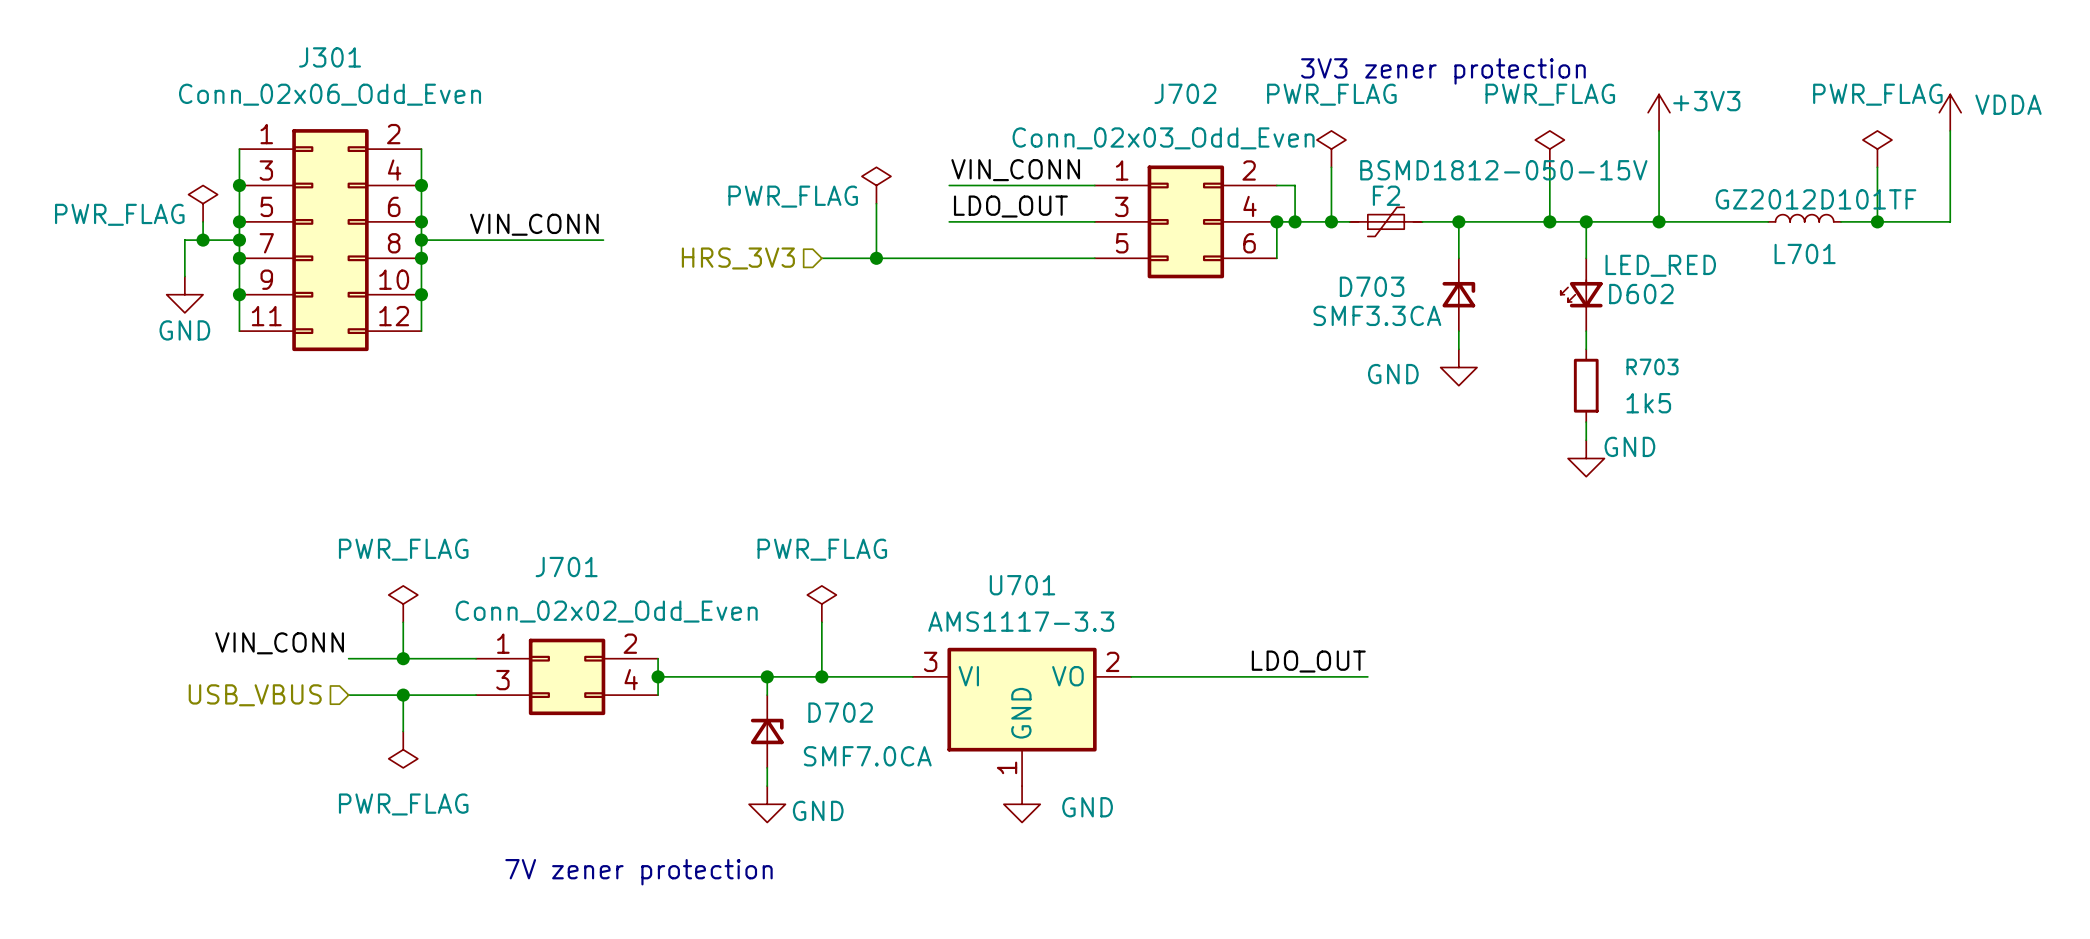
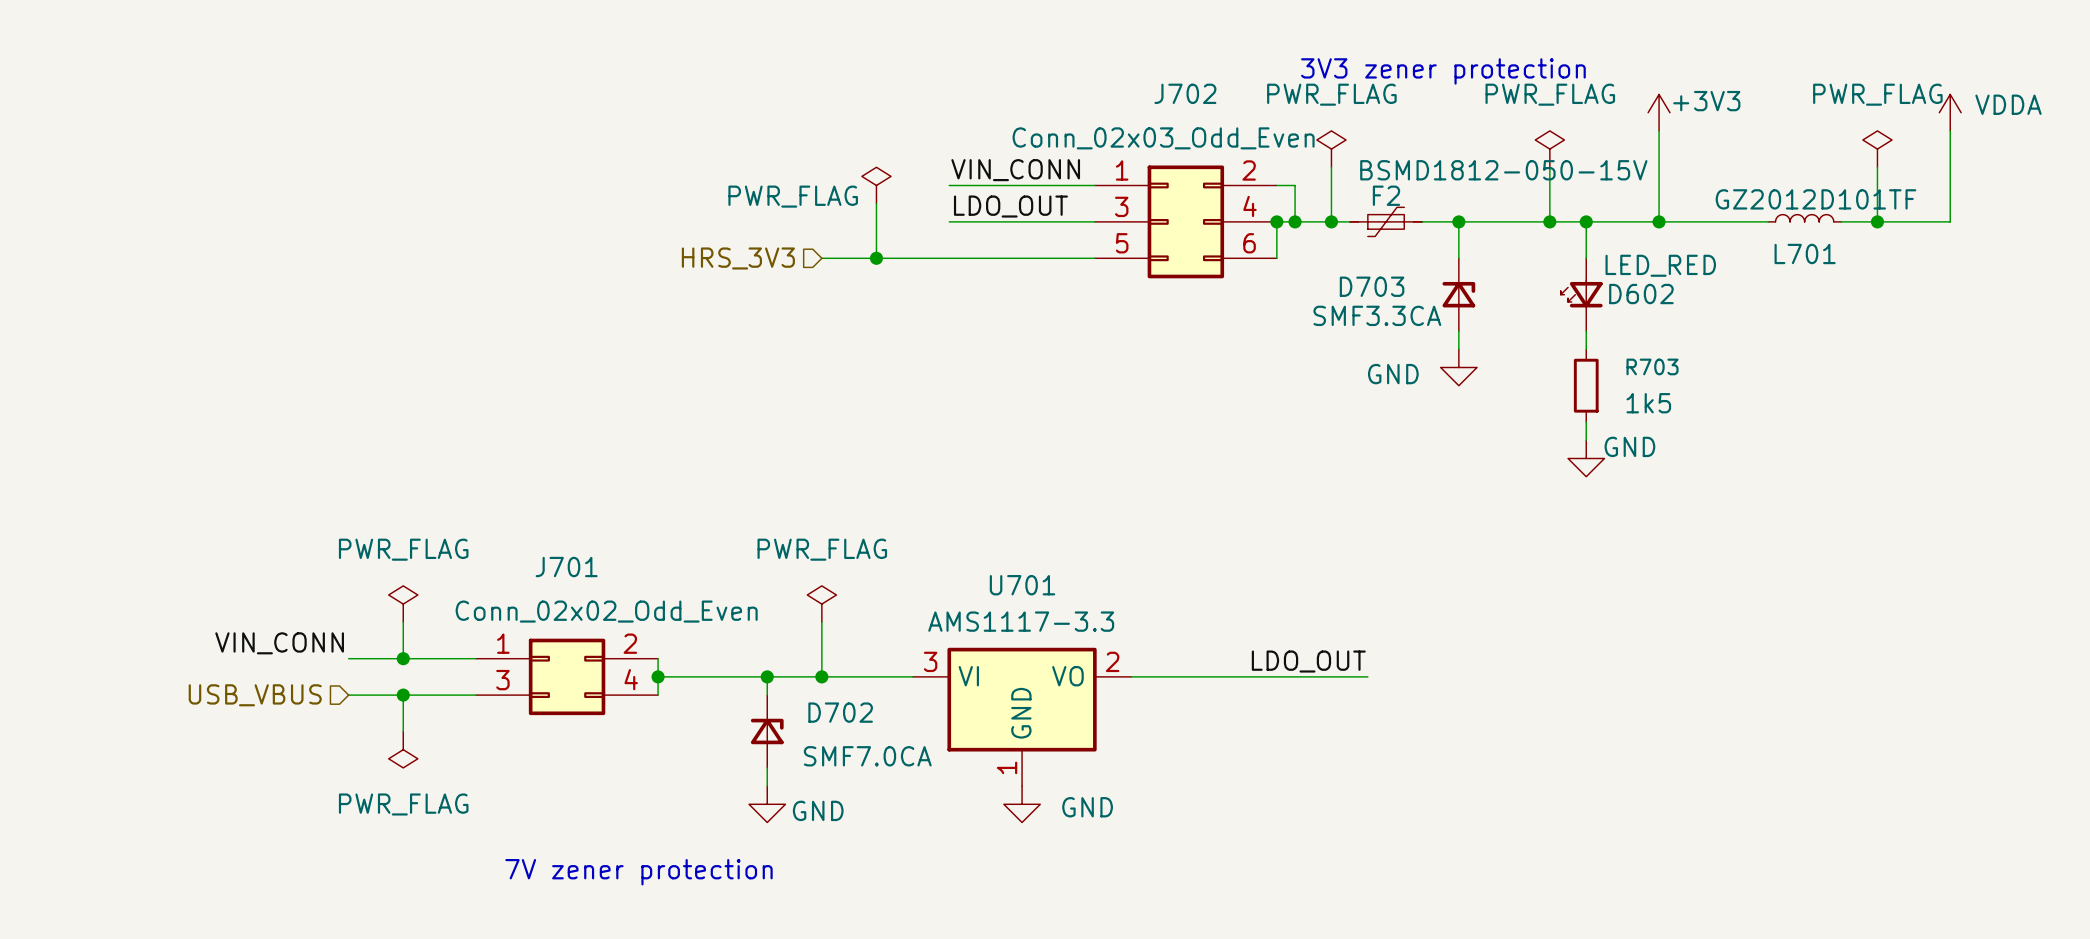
wire: (239, 149) (239, 331) -> none
wire: (421, 149) (421, 331) -> none
junction: (239, 185) -> none
junction: (421, 185) -> none
power symbol: PWR_FLAG (203, 203) -> none
wire: (203, 221) (203, 240) -> none
junction: (239, 221) -> none
junction: (421, 221) -> none
label: VIN_CONN (534, 224) -> none
junction: (203, 240) -> none
wire: (239, 240) (184, 240) (184, 276) -> none
junction: (239, 240) -> none
J301: Conn_02x06_Odd_Even (330, 240) -> none
wire: (421, 240) (603, 240) -> none
junction: (421, 240) -> none
junction: (239, 258) -> none
junction: (421, 258) -> none
power symbol: GND (184, 294) -> none
junction: (239, 294) -> none
junction: (421, 294) -> none

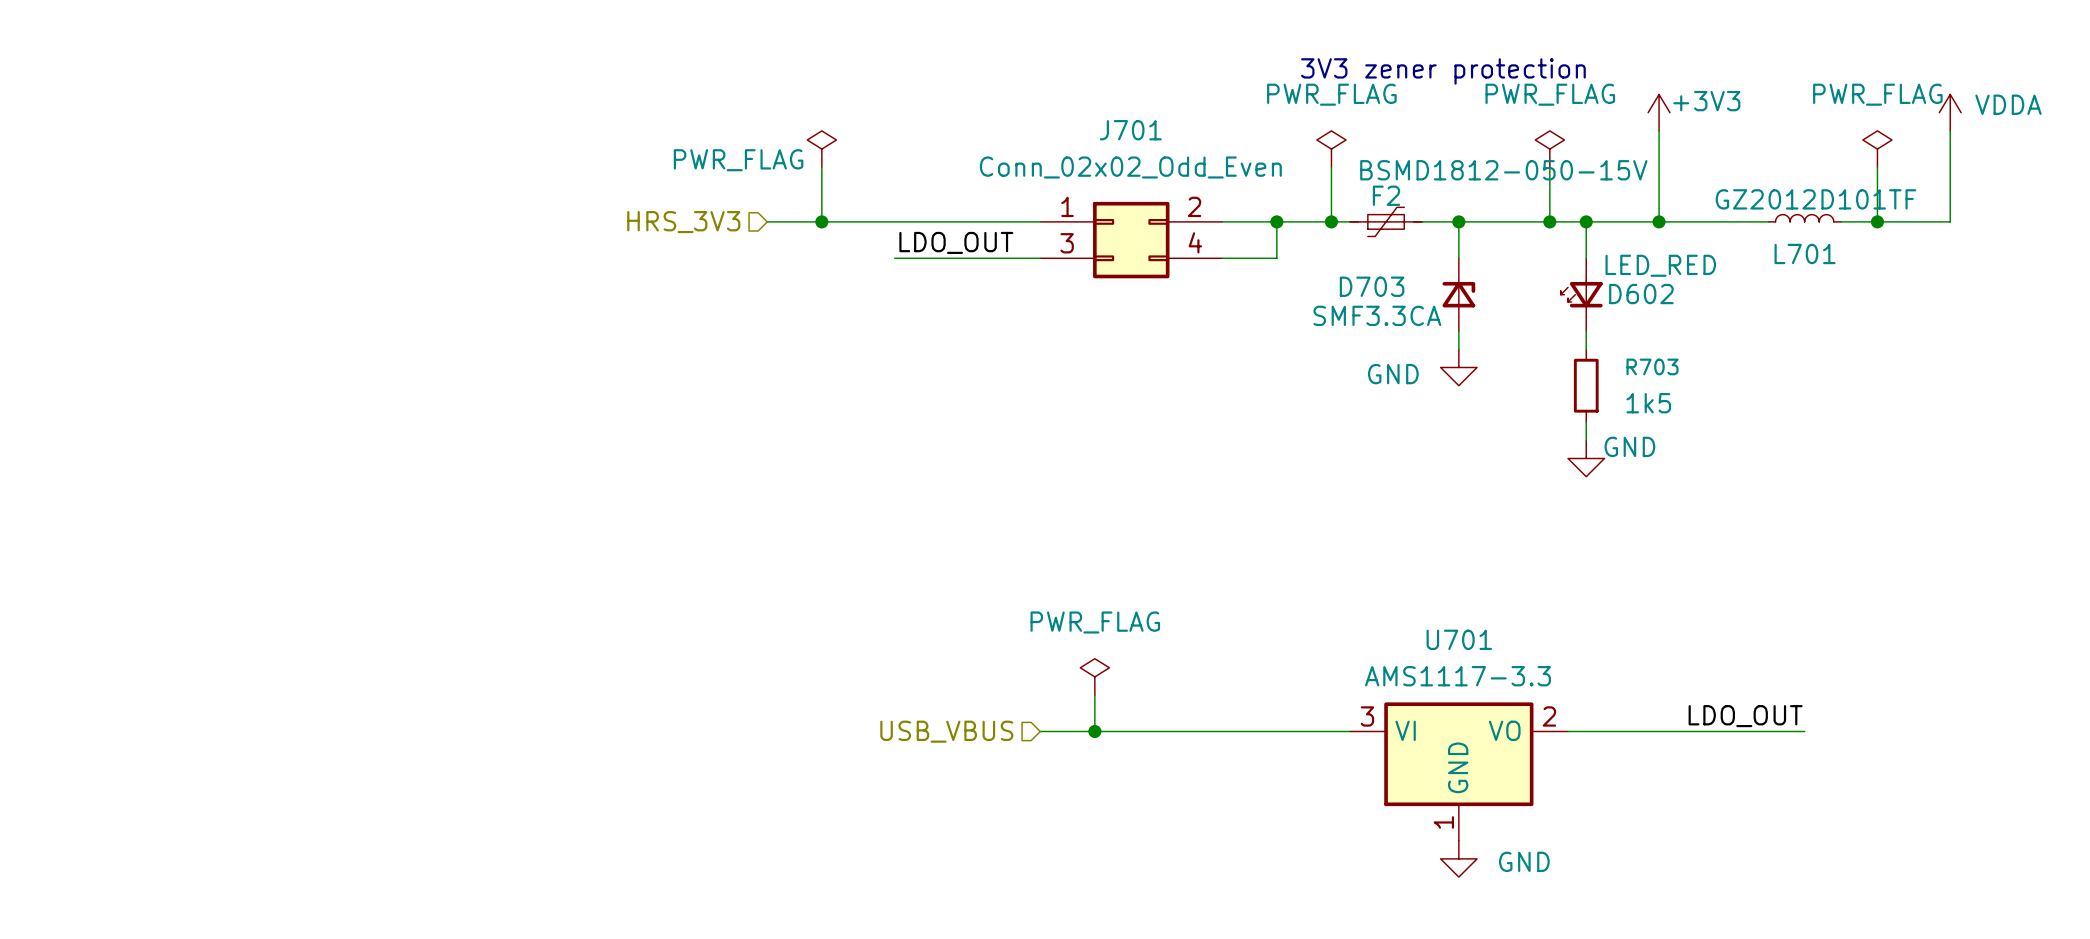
label: VIN_CONN (1015, 170) -> none
power symbol position: PWR_FLAG (876, 185) -> PWR_FLAG (821, 149)
wire: (949, 185) (1094, 185) -> none
wire: (1276, 185) (1295, 185) (1295, 221) -> none
wire: (876, 203) (876, 258) -> (821, 167) (821, 221)
label position: LDO_OUT (1010, 206) -> LDO_OUT (956, 242)
wire: none -> (767, 221) (949, 221)
J702: Conn_02x03_Odd_Even (1185, 221) -> none
junction: (1295, 221) -> none
hierarchical label position: HRS_3V3 (738, 258) -> HRS_3V3 (683, 222)
wire: (821, 258) (894, 258) -> none
junction position: (876, 258) -> (821, 221)
power symbol: PWR_FLAG (403, 604) -> none
power symbol: PWR_FLAG (821, 604) -> none
J701 value position: Conn_02x02_Odd_Even (606, 611) -> Conn_02x02_Odd_Even (1130, 167)
wire: (403, 622) (403, 658) -> none
wire: (821, 622) (821, 676) -> none
label: VIN_CONN (279, 643) -> none
wire: (348, 658) (476, 658) -> none
junction: (403, 658) -> none
wire: (658, 658) (658, 695) -> none
label: LDO_OUT (1308, 661) -> none
J701 position: (567, 676) -> (1131, 240)
wire: (658, 676) (912, 676) -> none
junction: (658, 676) -> none
wire: (767, 676) (767, 695) -> none
junction: (767, 676) -> none
junction: (821, 676) -> none
power symbol: none -> PWR_FLAG (1094, 676)
wire: (1131, 676) (1367, 676) -> none
hierarchical label: USB_VBUS (255, 695) -> none
wire: (348, 695) (476, 695) -> none
wire: (403, 695) (403, 731) -> none
junction: (403, 695) -> none
U701 position: (1022, 716) -> (1458, 771)
label: none -> LDO_OUT (1745, 716)
D702: SMF7.0CA (767, 731) -> none
hierarchical label: none -> USB_VBUS (946, 731)
wire: none -> (1040, 731) (1349, 731)
junction: none -> (1094, 731)
wire: none -> (1568, 731) (1804, 731)
power symbol: PWR_FLAG (403, 749) -> none
wire: (767, 767) (767, 786) -> none
power symbol: GND (767, 804) -> none
power symbol: GND (1022, 804) -> none
power symbol: none -> GND (1458, 858)
text: 7V zener protection (638, 872) -> none

